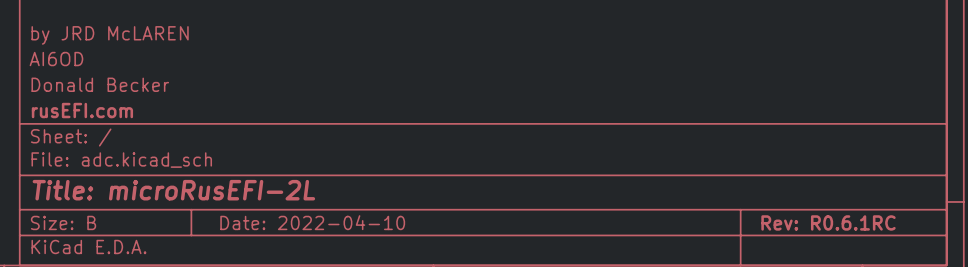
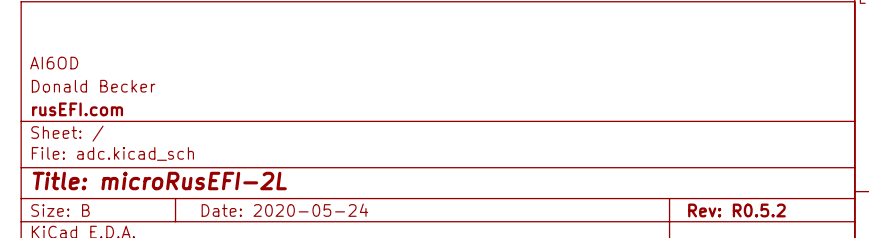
title block: by JRD McLAREN (110, 35) -> none
title block: Date: 2022-04-10 (312, 222) -> Date: 2020-05-24 (284, 210)
title block: Rev: R0.6.1RC (828, 222) -> Rev: R0.5.2 (736, 210)

